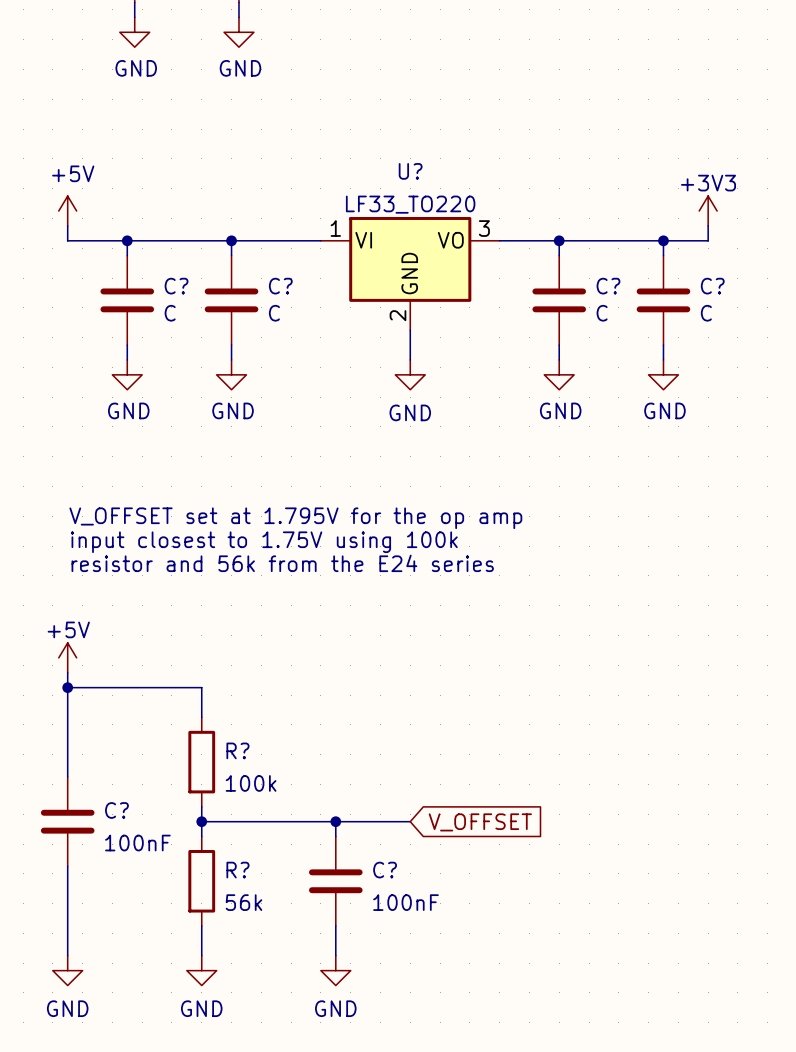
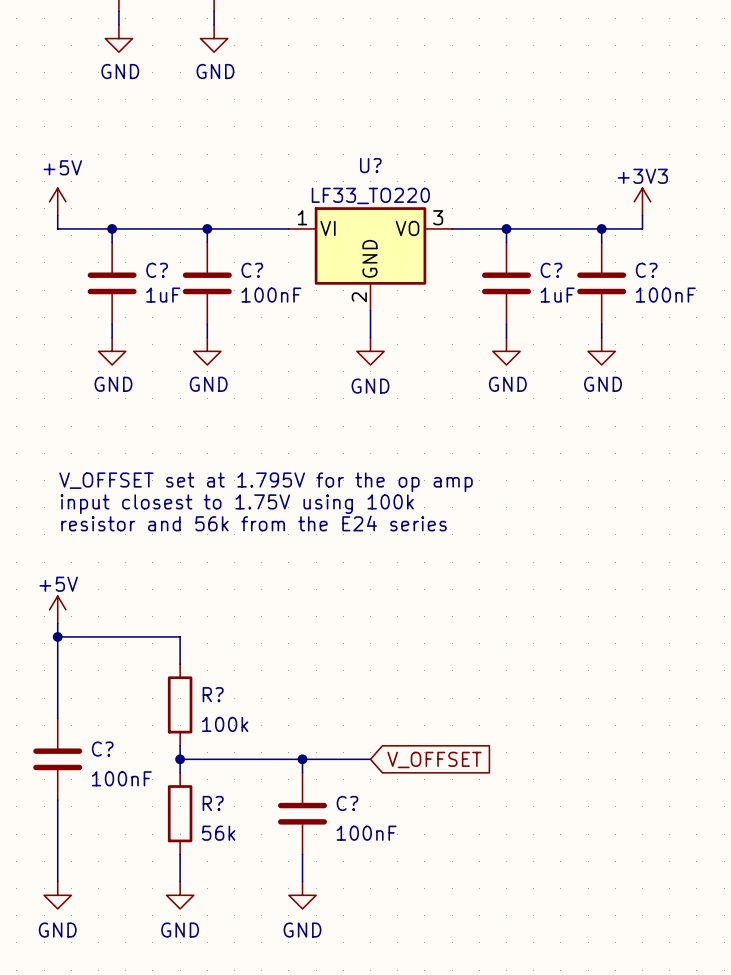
C? value: C (170, 313) -> 1uF (163, 295)
C? value: C (274, 313) -> 100nF (271, 295)
C? value: C (602, 313) -> 1uF (557, 295)
C? value: C (706, 313) -> 100nF (665, 295)

